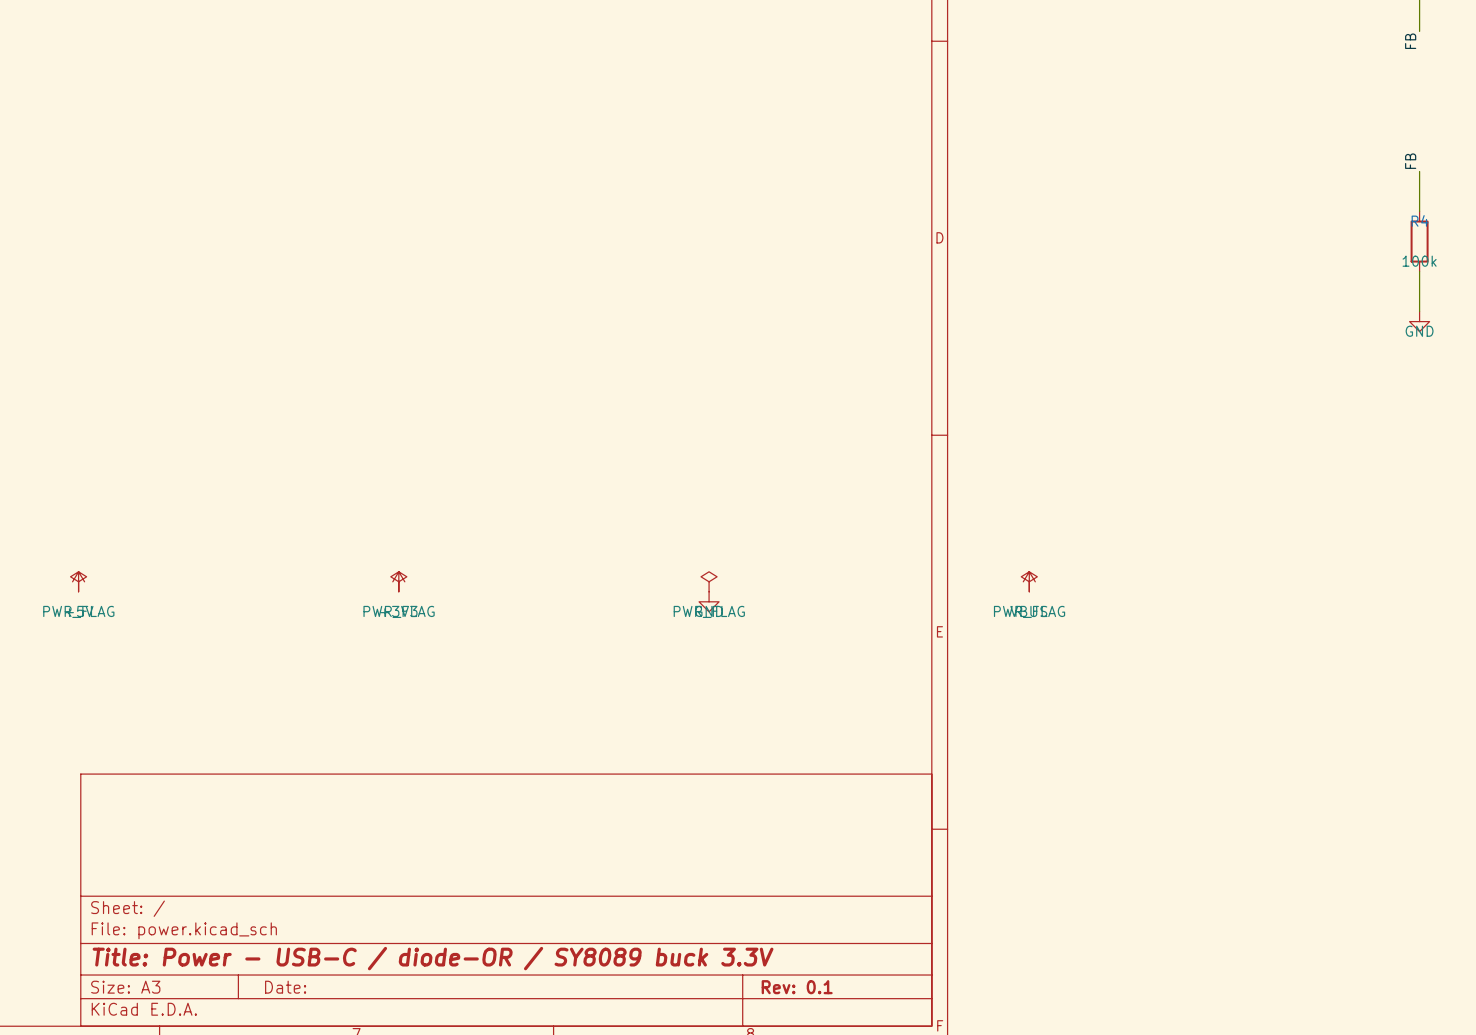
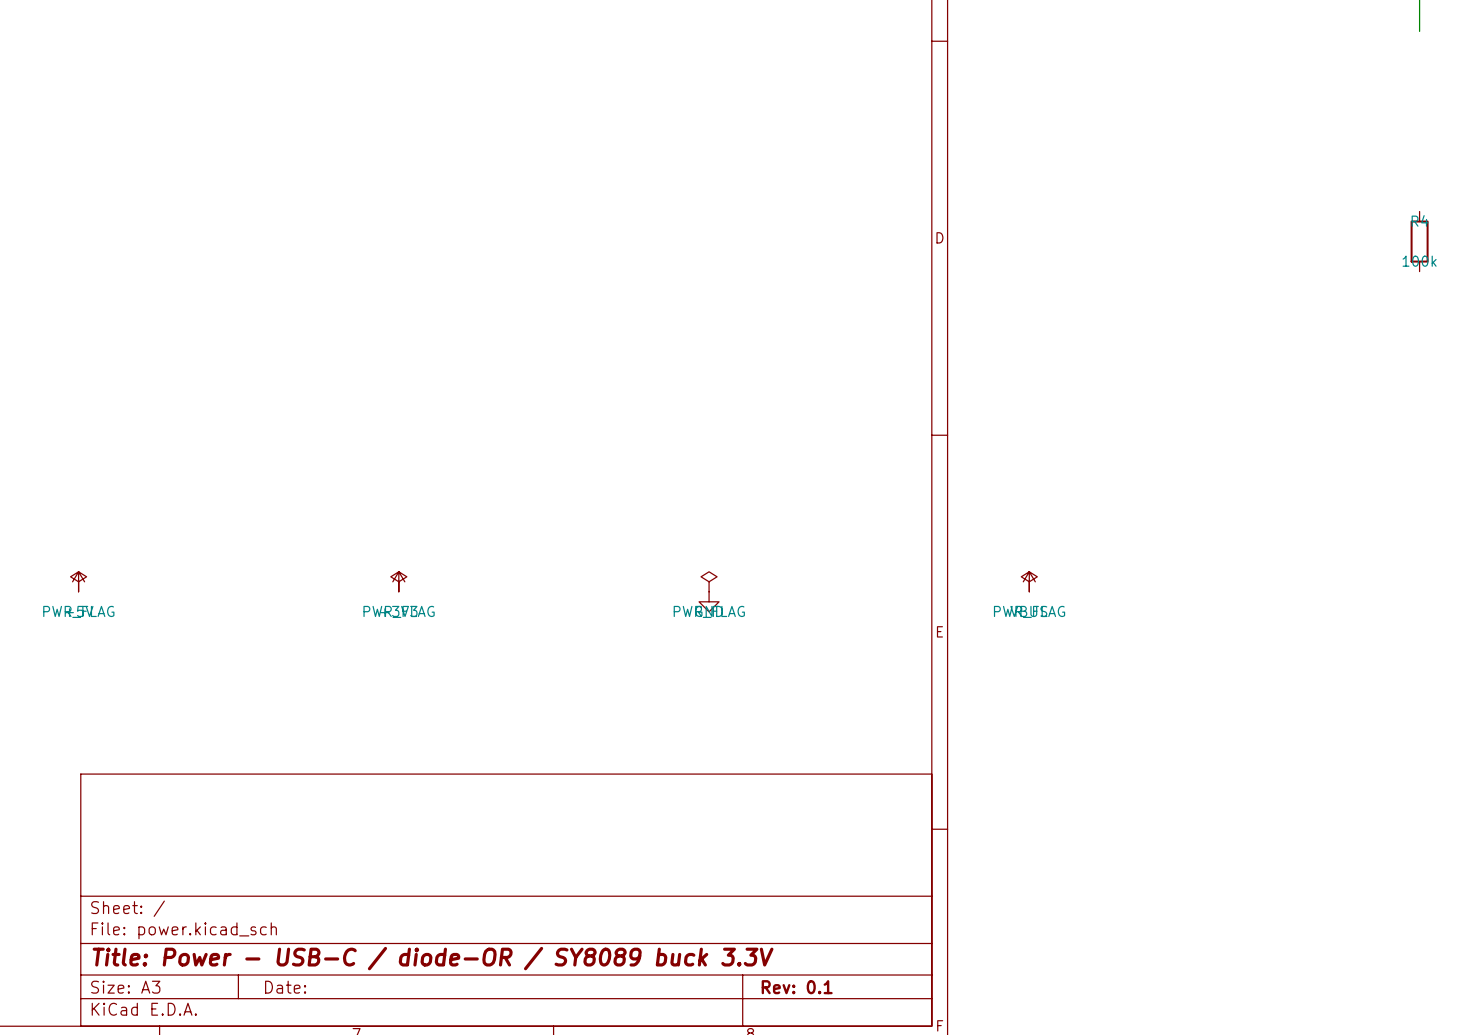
label: FB (1410, 41) -> none
label: FB (1410, 161) -> none
wire: (1419, 171) (1419, 211) -> none
wire: (1419, 271) (1419, 311) -> none
power symbol: GND (1419, 321) -> none

